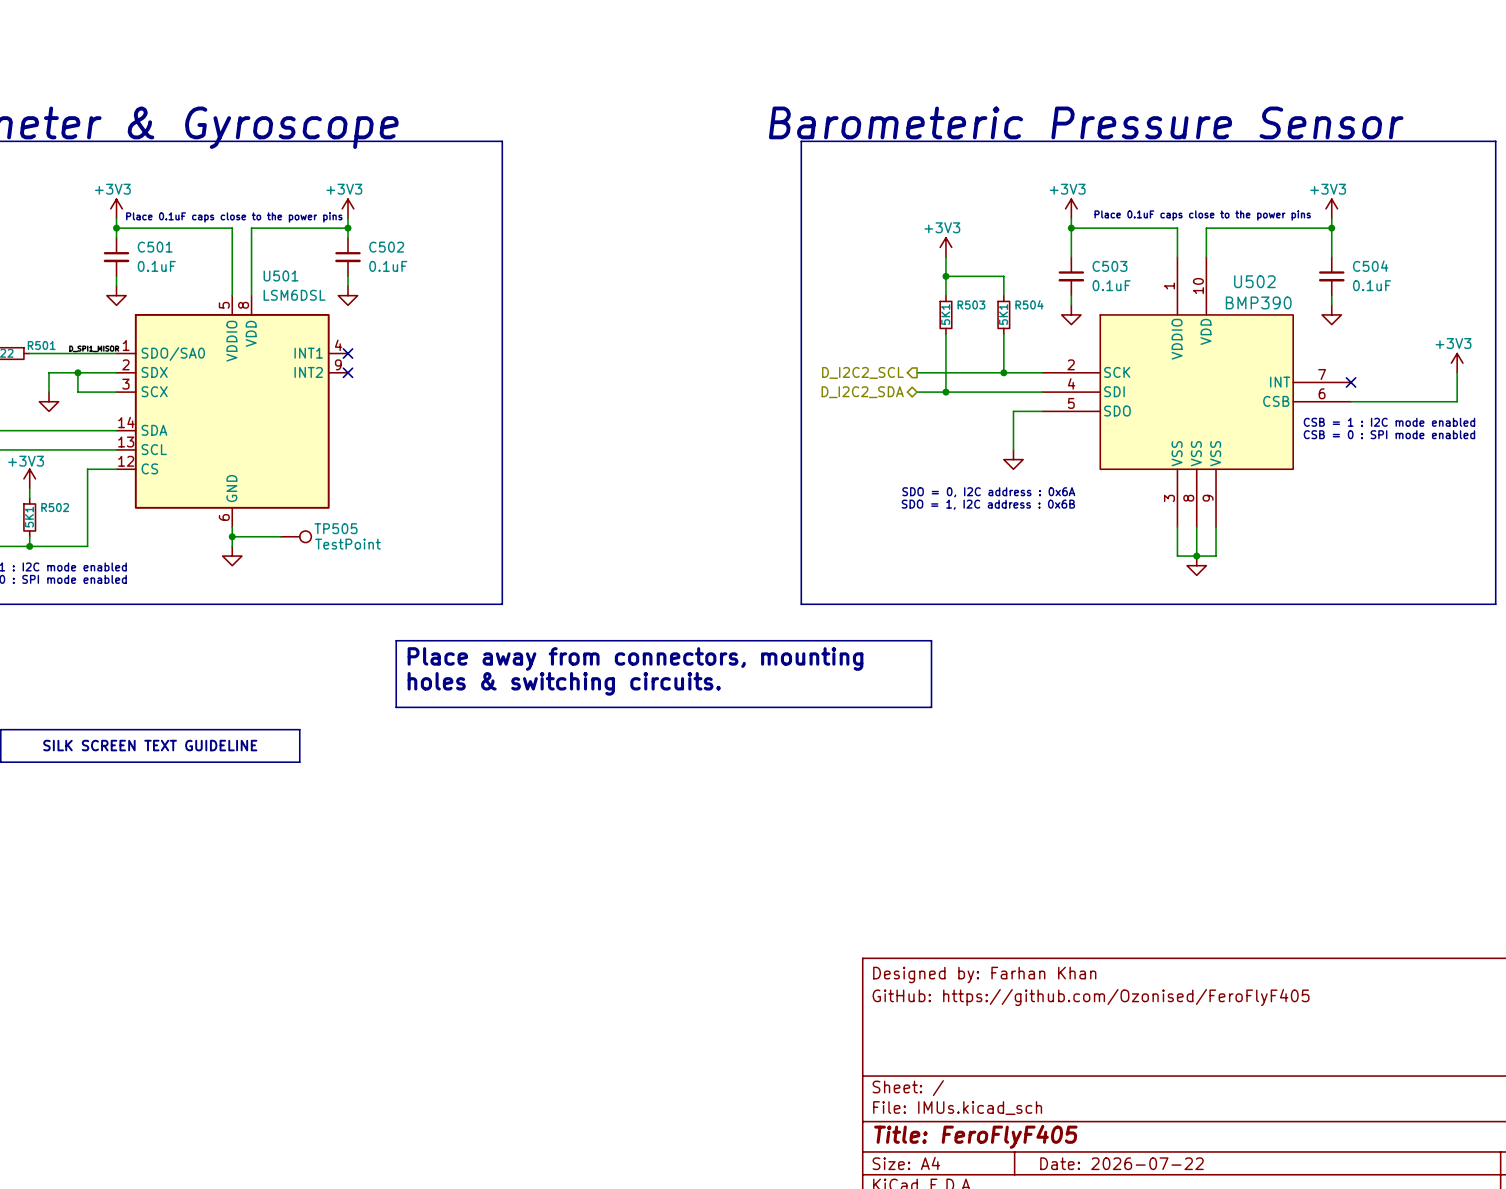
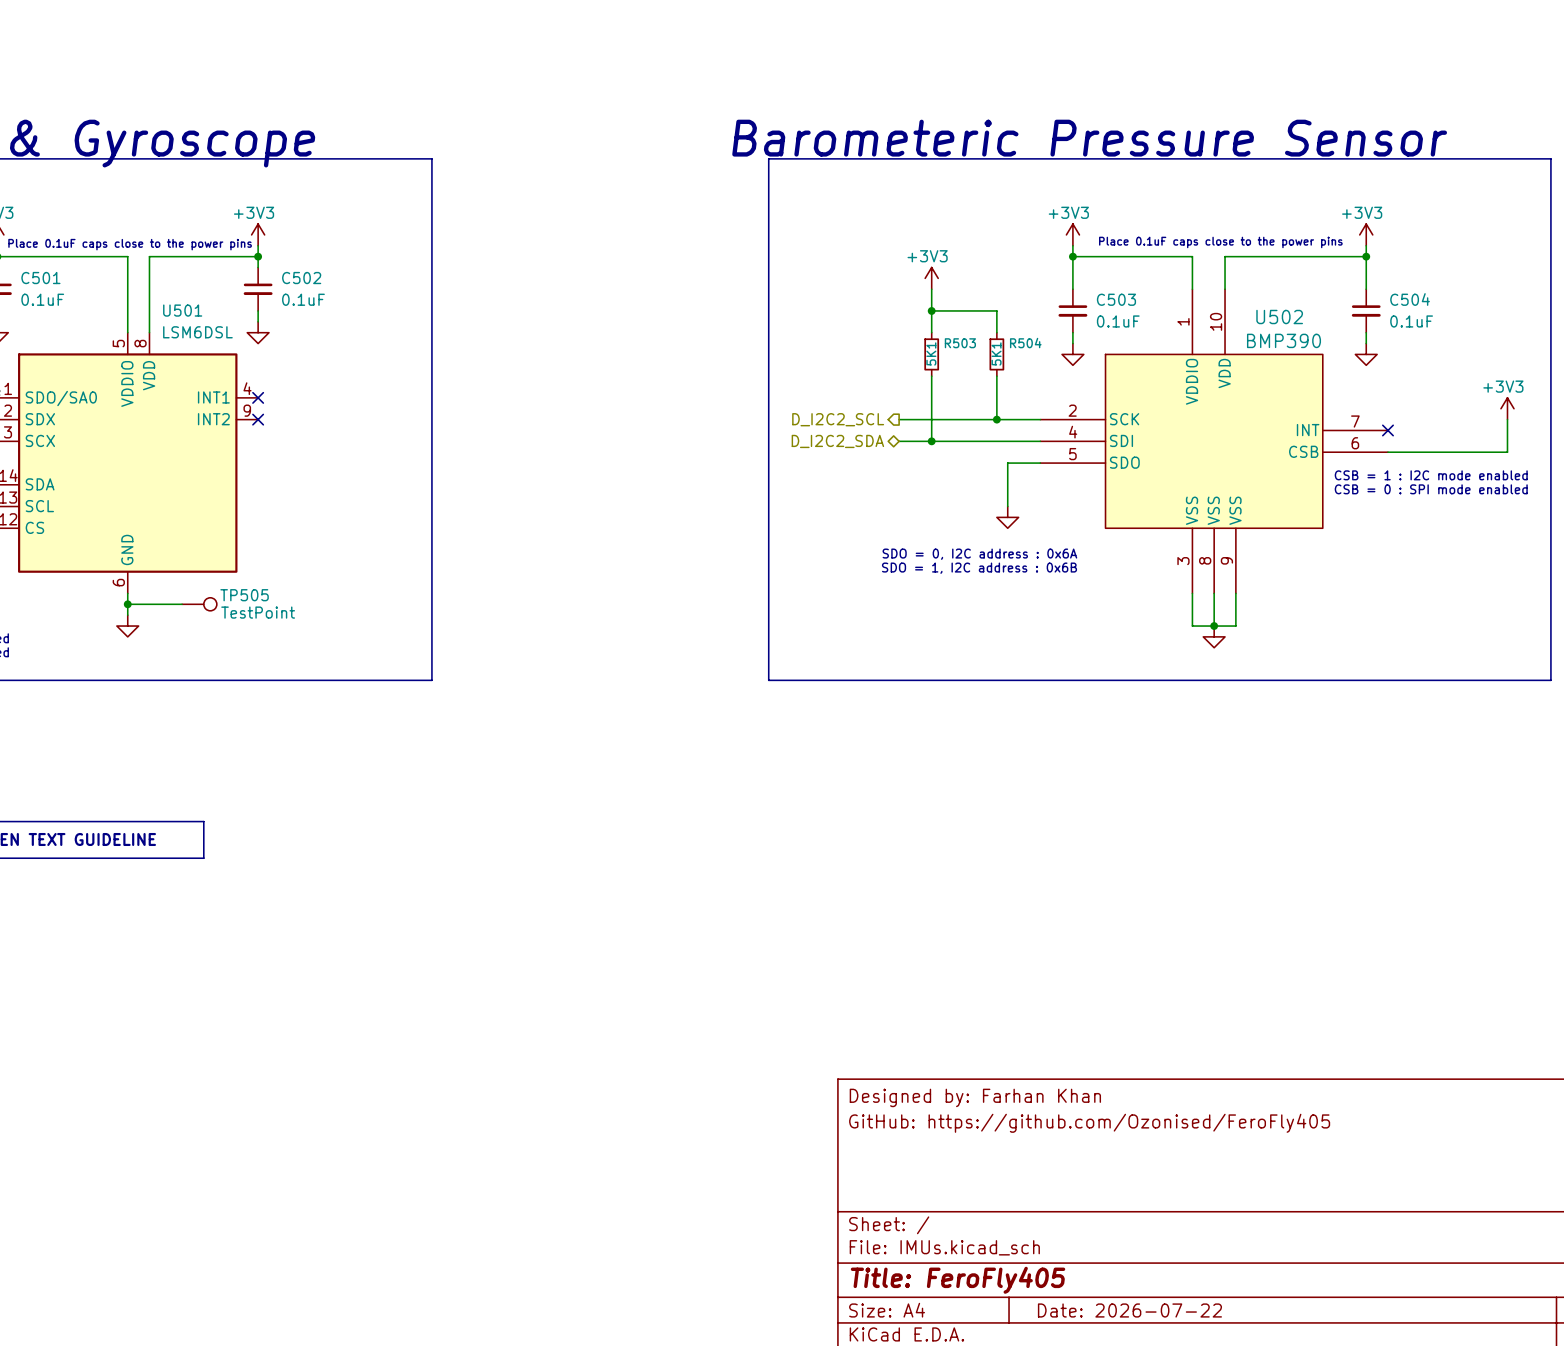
line: (396, 640) (931, 640) (931, 707) (396, 707) (396, 640) -> none
text: Place away from connectors, mounting (635, 659) -> none
text: holes & switching circuits. (564, 683) -> none
title block: GitHub: https://github.com/Ozonised/FeroFlyF405 (1091, 997) -> GitHub: https://github.com/Ozonised/FeroFly405 (1089, 1123)
title block: Title: FeroFlyF405 (975, 1136) -> Title: FeroFly405 (958, 1280)

